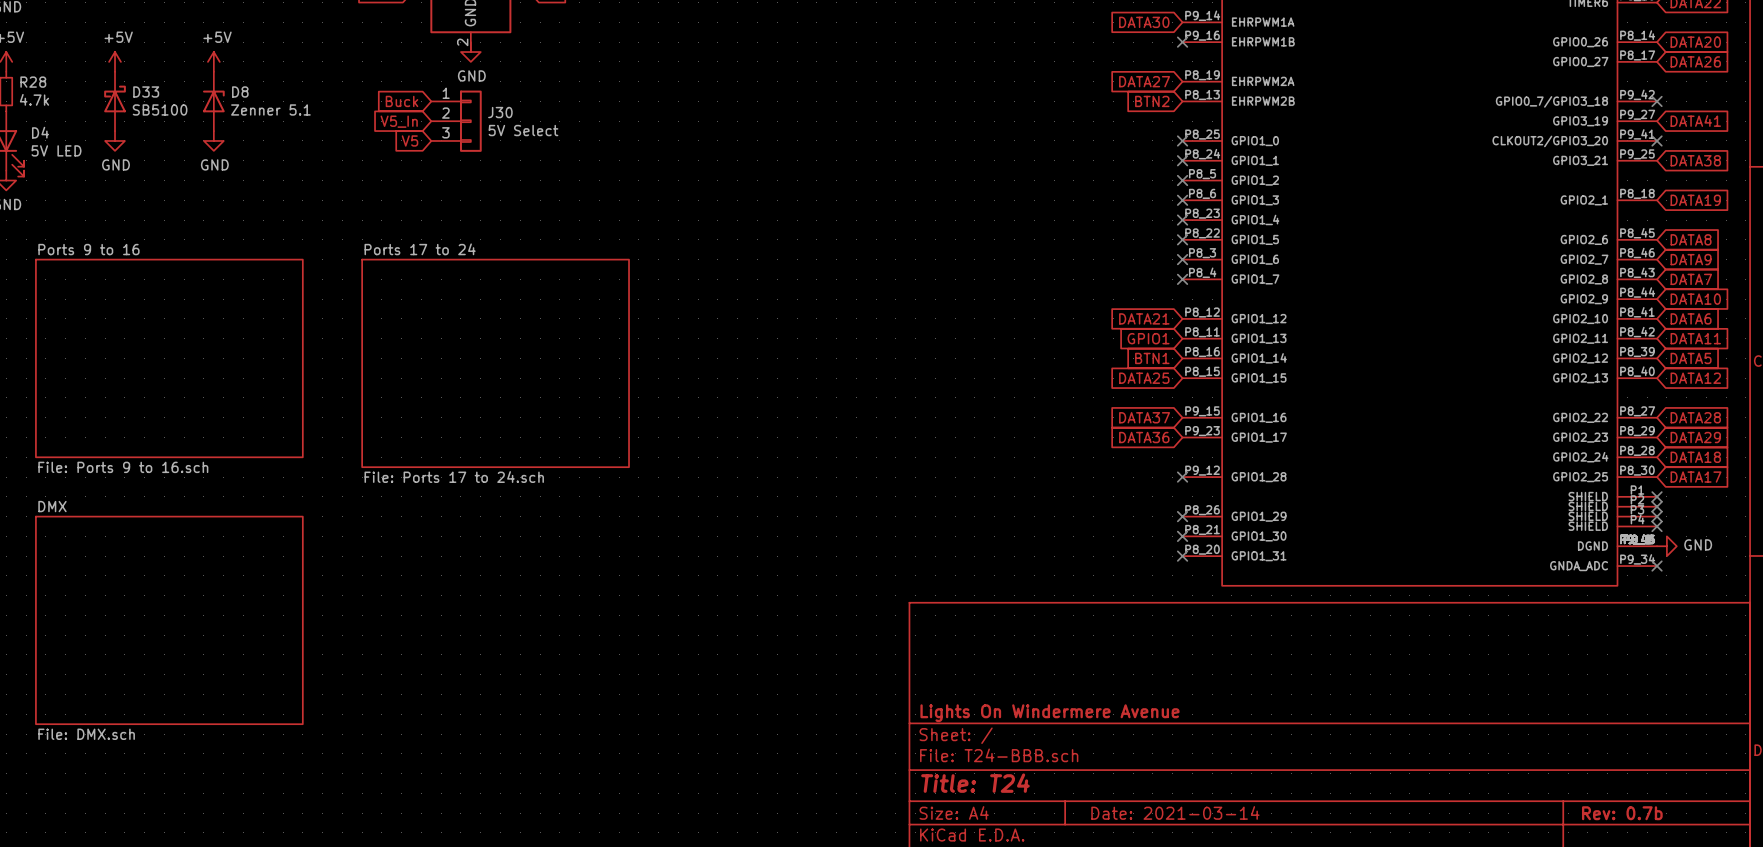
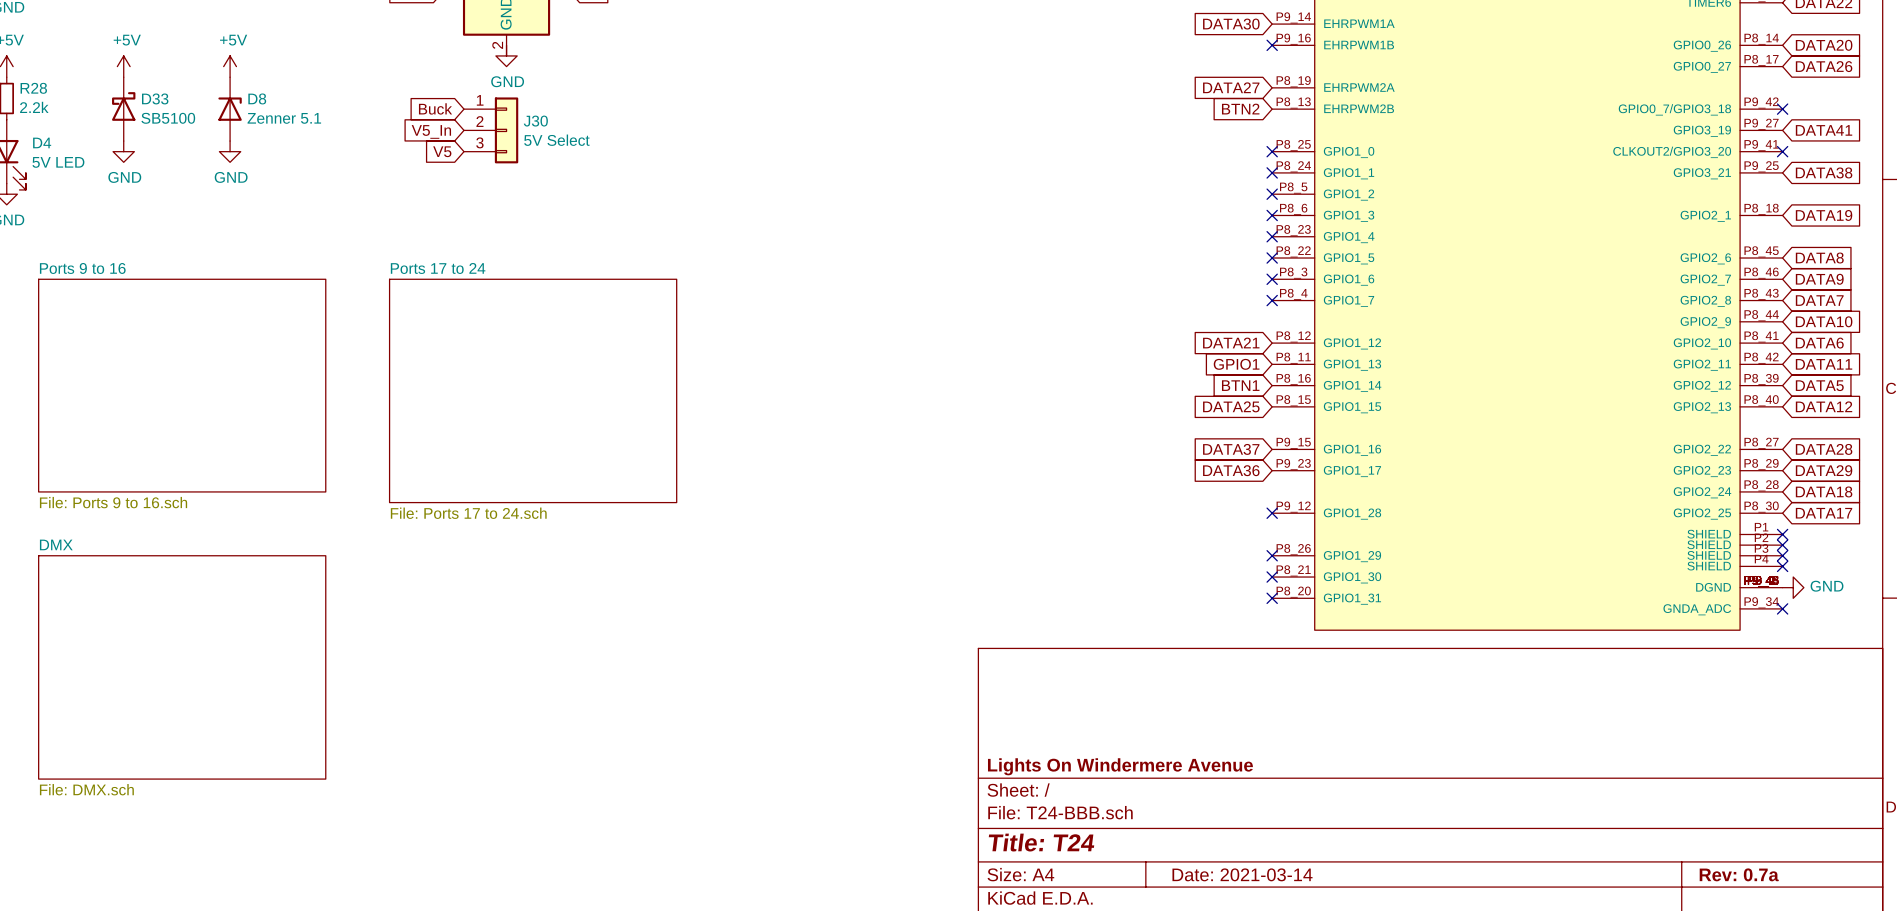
R28 value: 4.7k (34, 99) -> 2.2k (34, 107)
title block: Rev: 0.7b (1622, 813) -> Rev: 0.7a (1739, 874)

